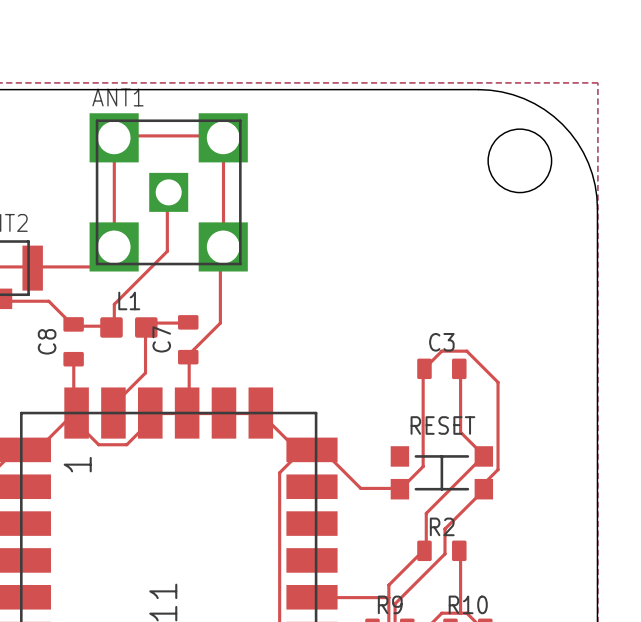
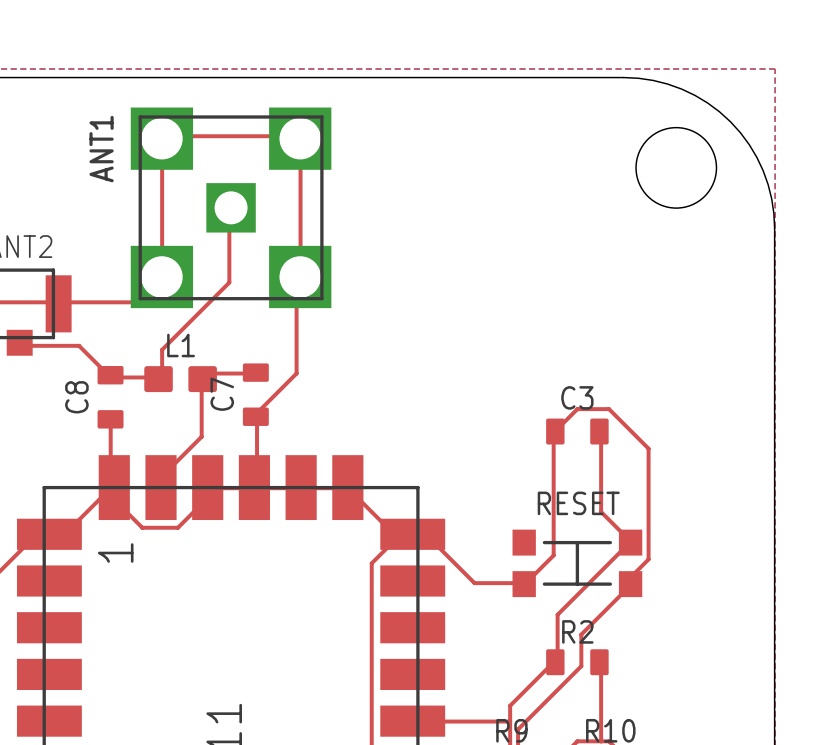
ANT1 name rotation: 0° (117, 97) -> 90° counterclockwise (101, 149)
ANT1 name position: ANT1 (117, 97) -> ANT1 (101, 149)

